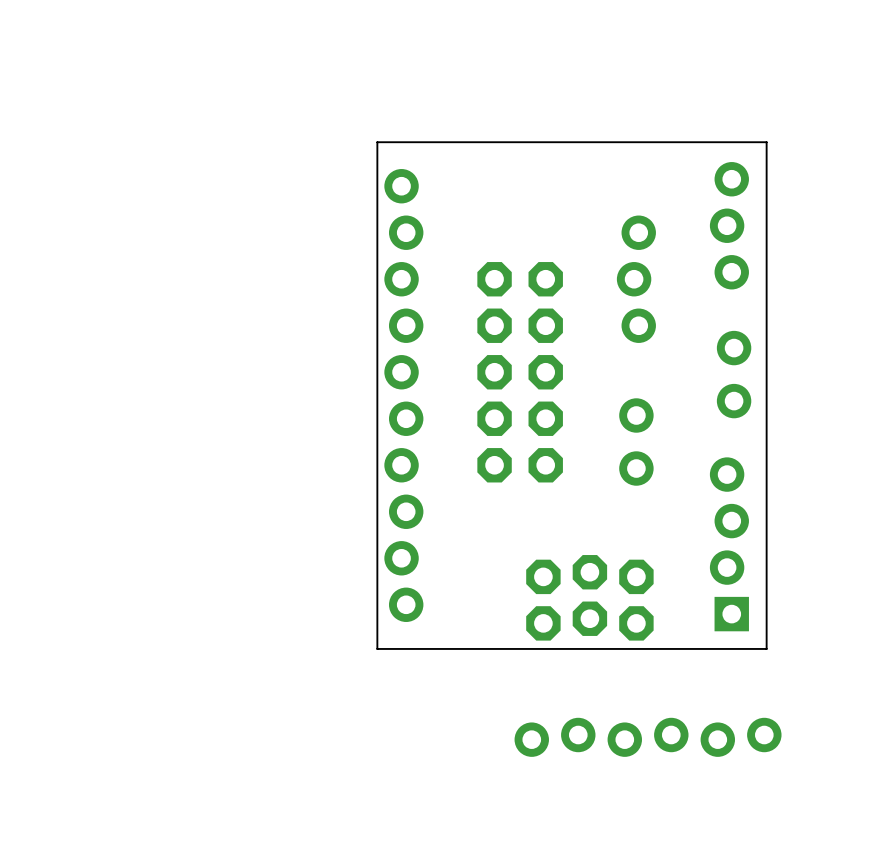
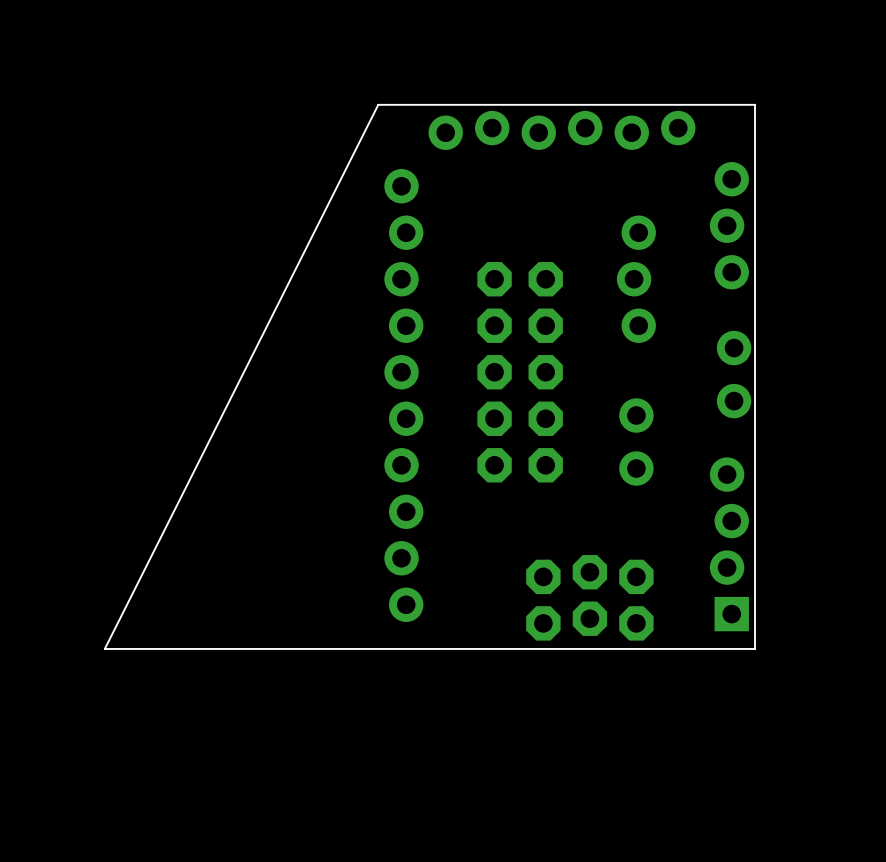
part: none -> (562, 130)
board edge: (755, 648) (766, 648) (766, 142) (377, 142) (377, 648) -> (755, 648) (755, 104) (378, 104) (104, 648) (377, 648)
part: (648, 737) -> none

